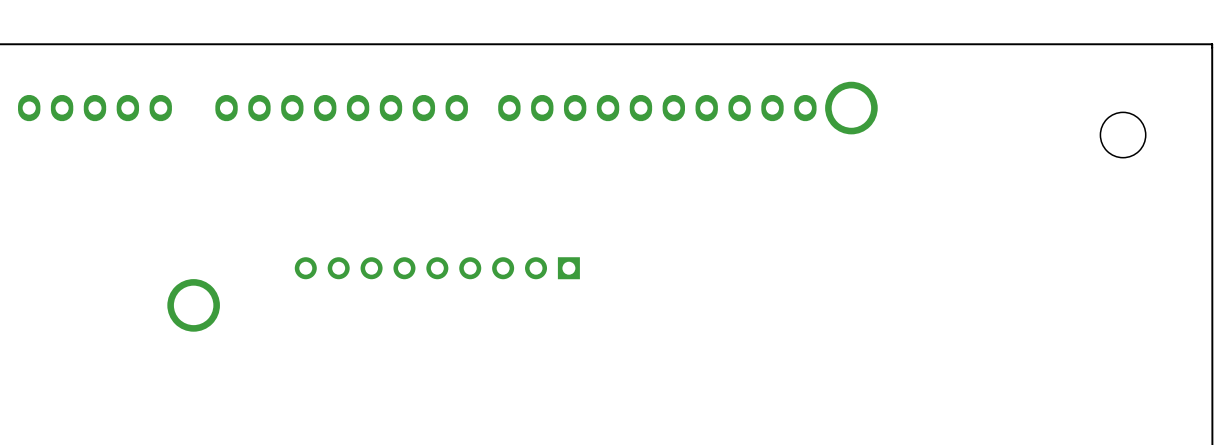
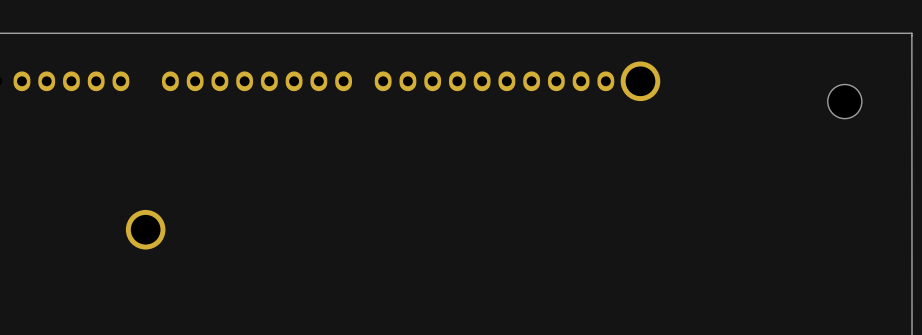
part: (437, 268) -> none

